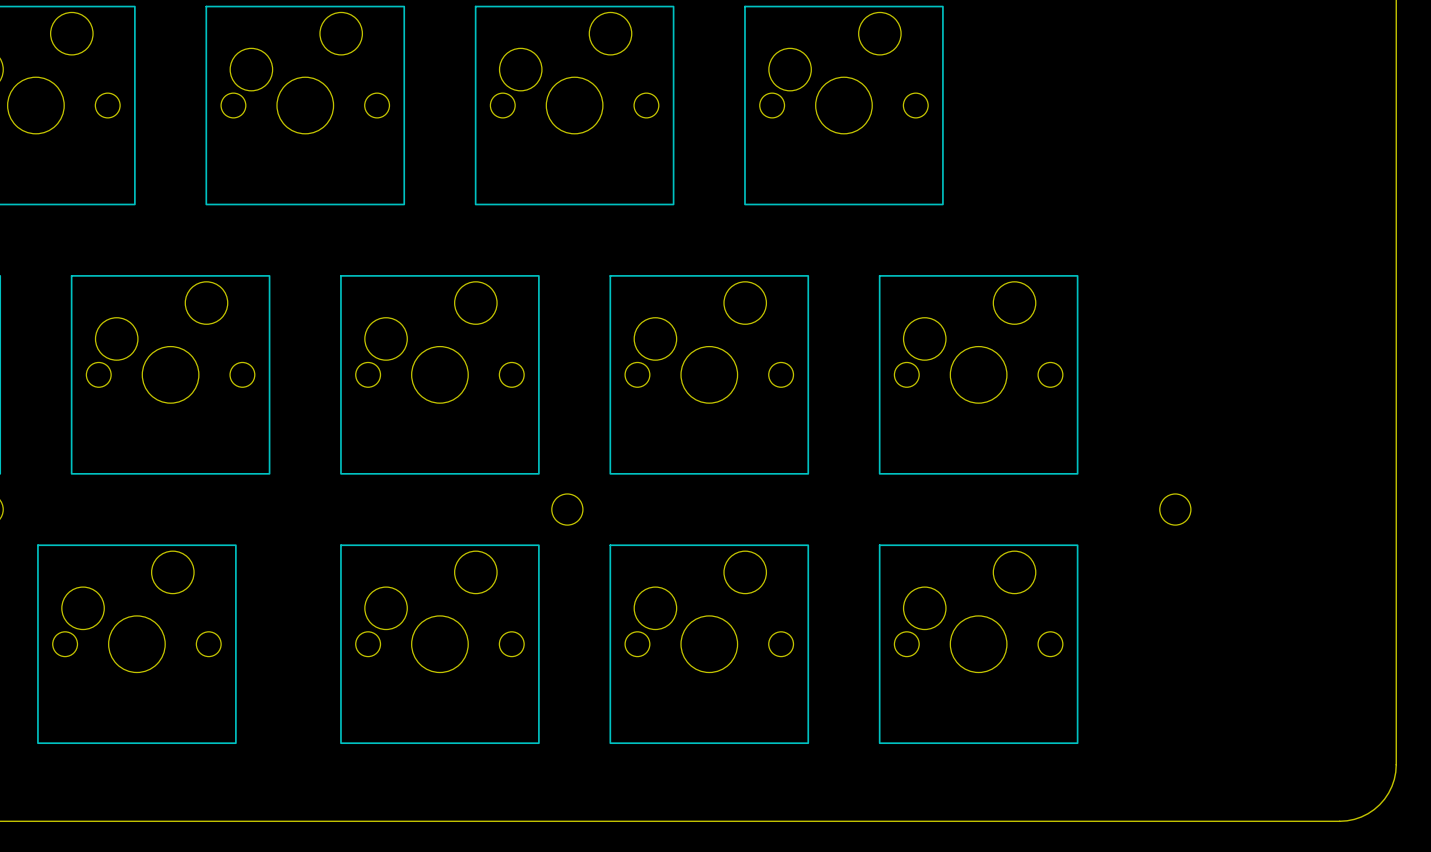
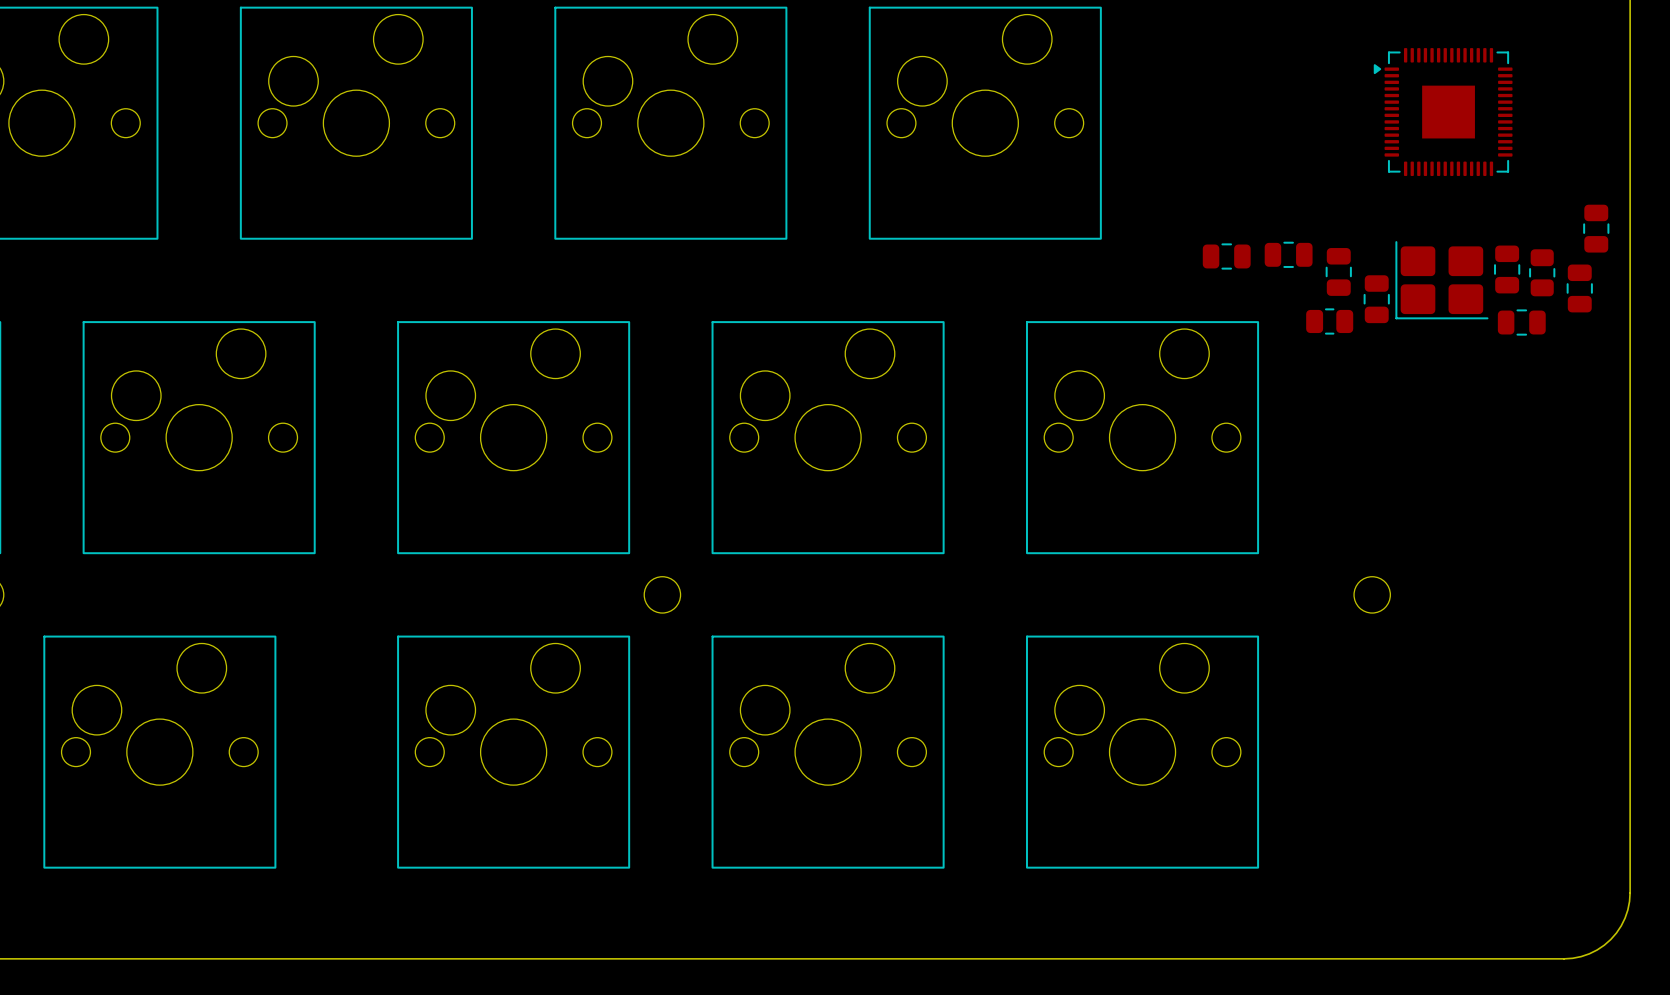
part: none -> (1443, 112)
part: none -> (1596, 228)
part: none -> (1288, 254)
part: none -> (1226, 256)
part: none -> (1507, 269)
part: none -> (1338, 271)
part: none -> (1542, 272)
part: none -> (1441, 280)
part: none -> (1579, 288)
part: none -> (1376, 299)
part: none -> (1329, 321)
part: none -> (1521, 322)

